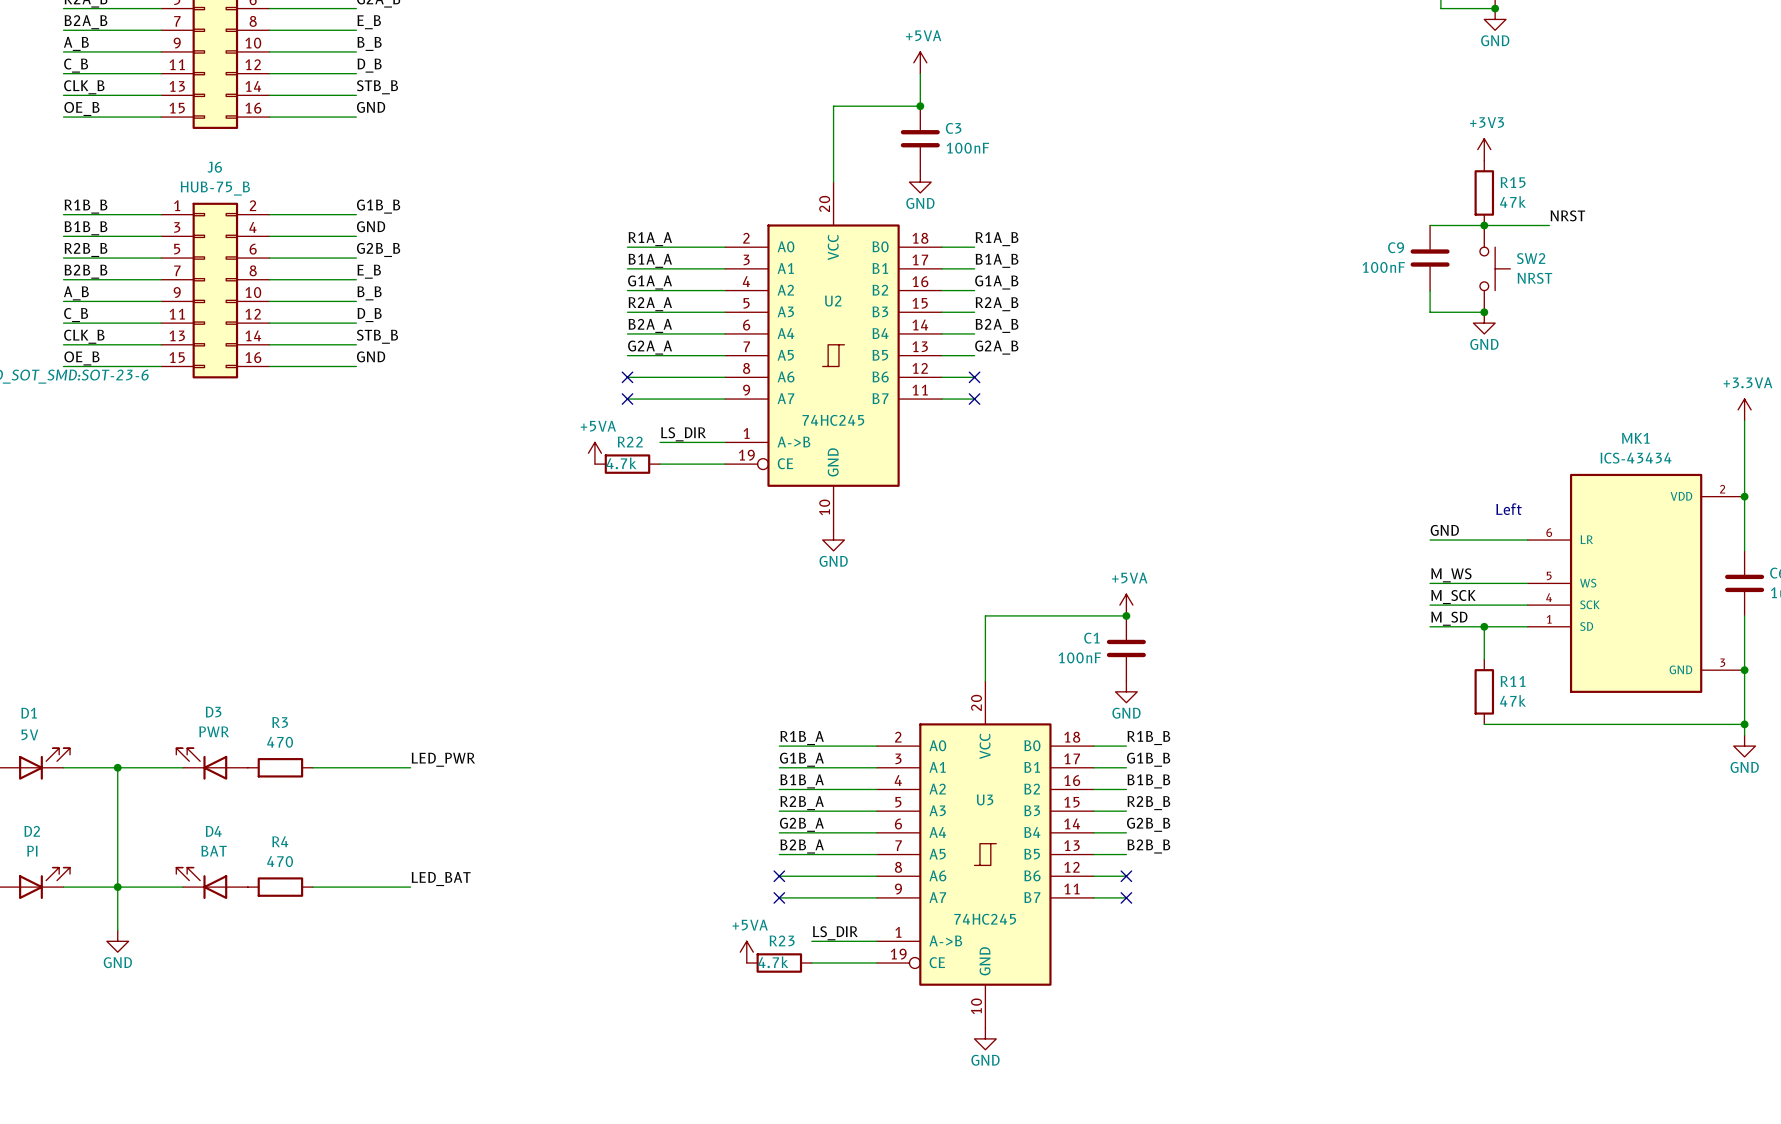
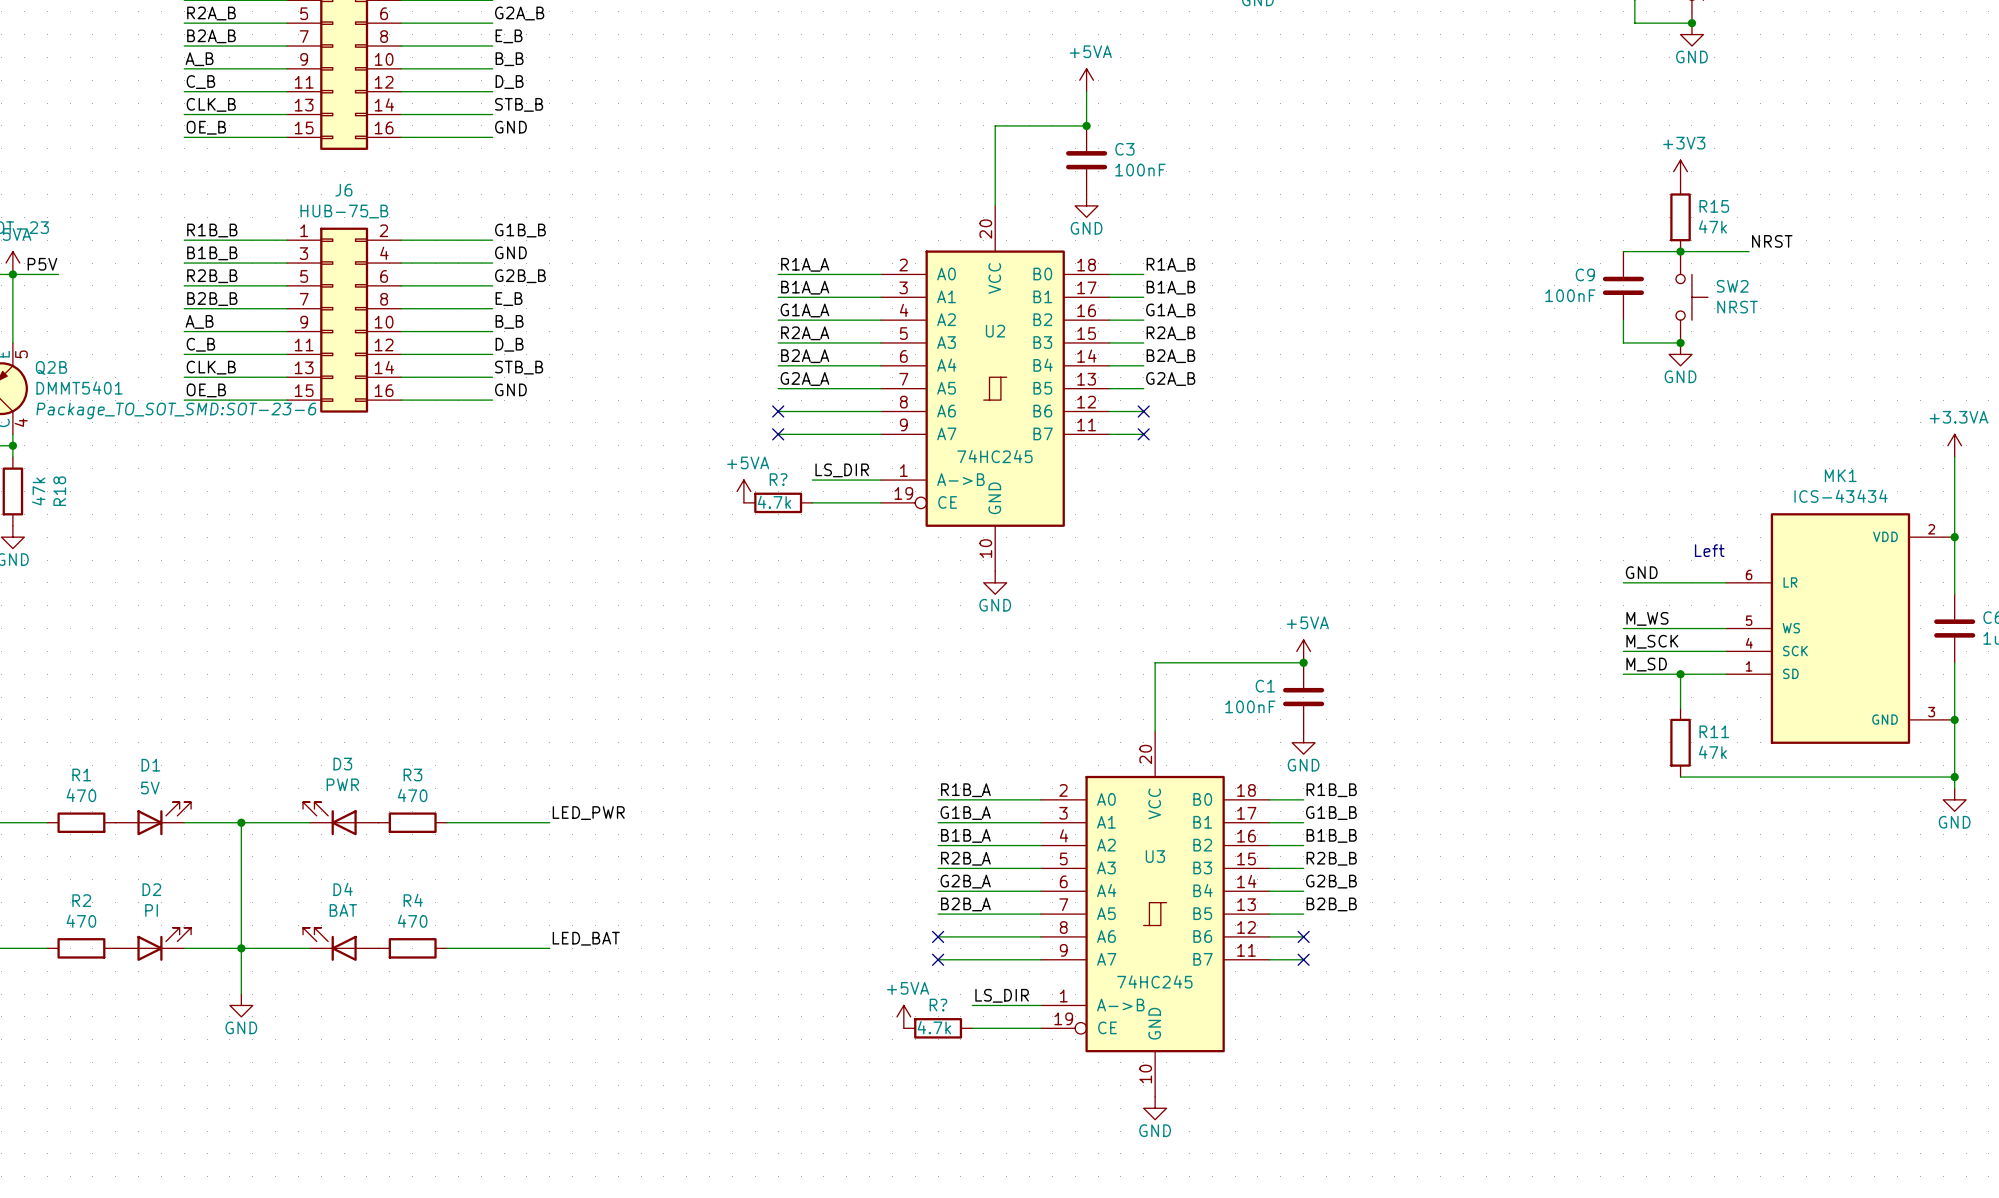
R22 name: R22 (630, 442) -> R? (778, 479)
R23 name: R23 (782, 940) -> R? (938, 1005)

